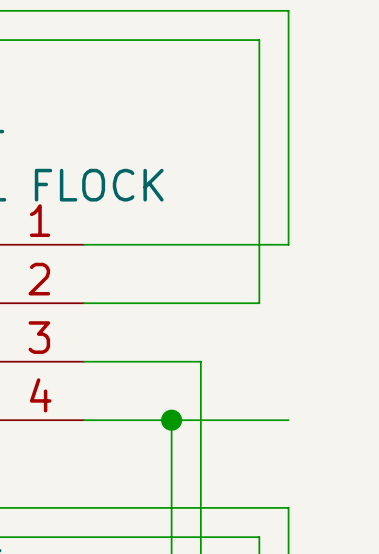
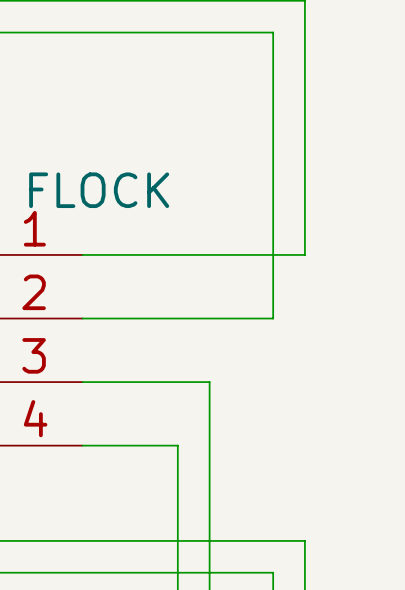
wire: (171, 420) (288, 420) -> none
junction: (171, 420) -> none

